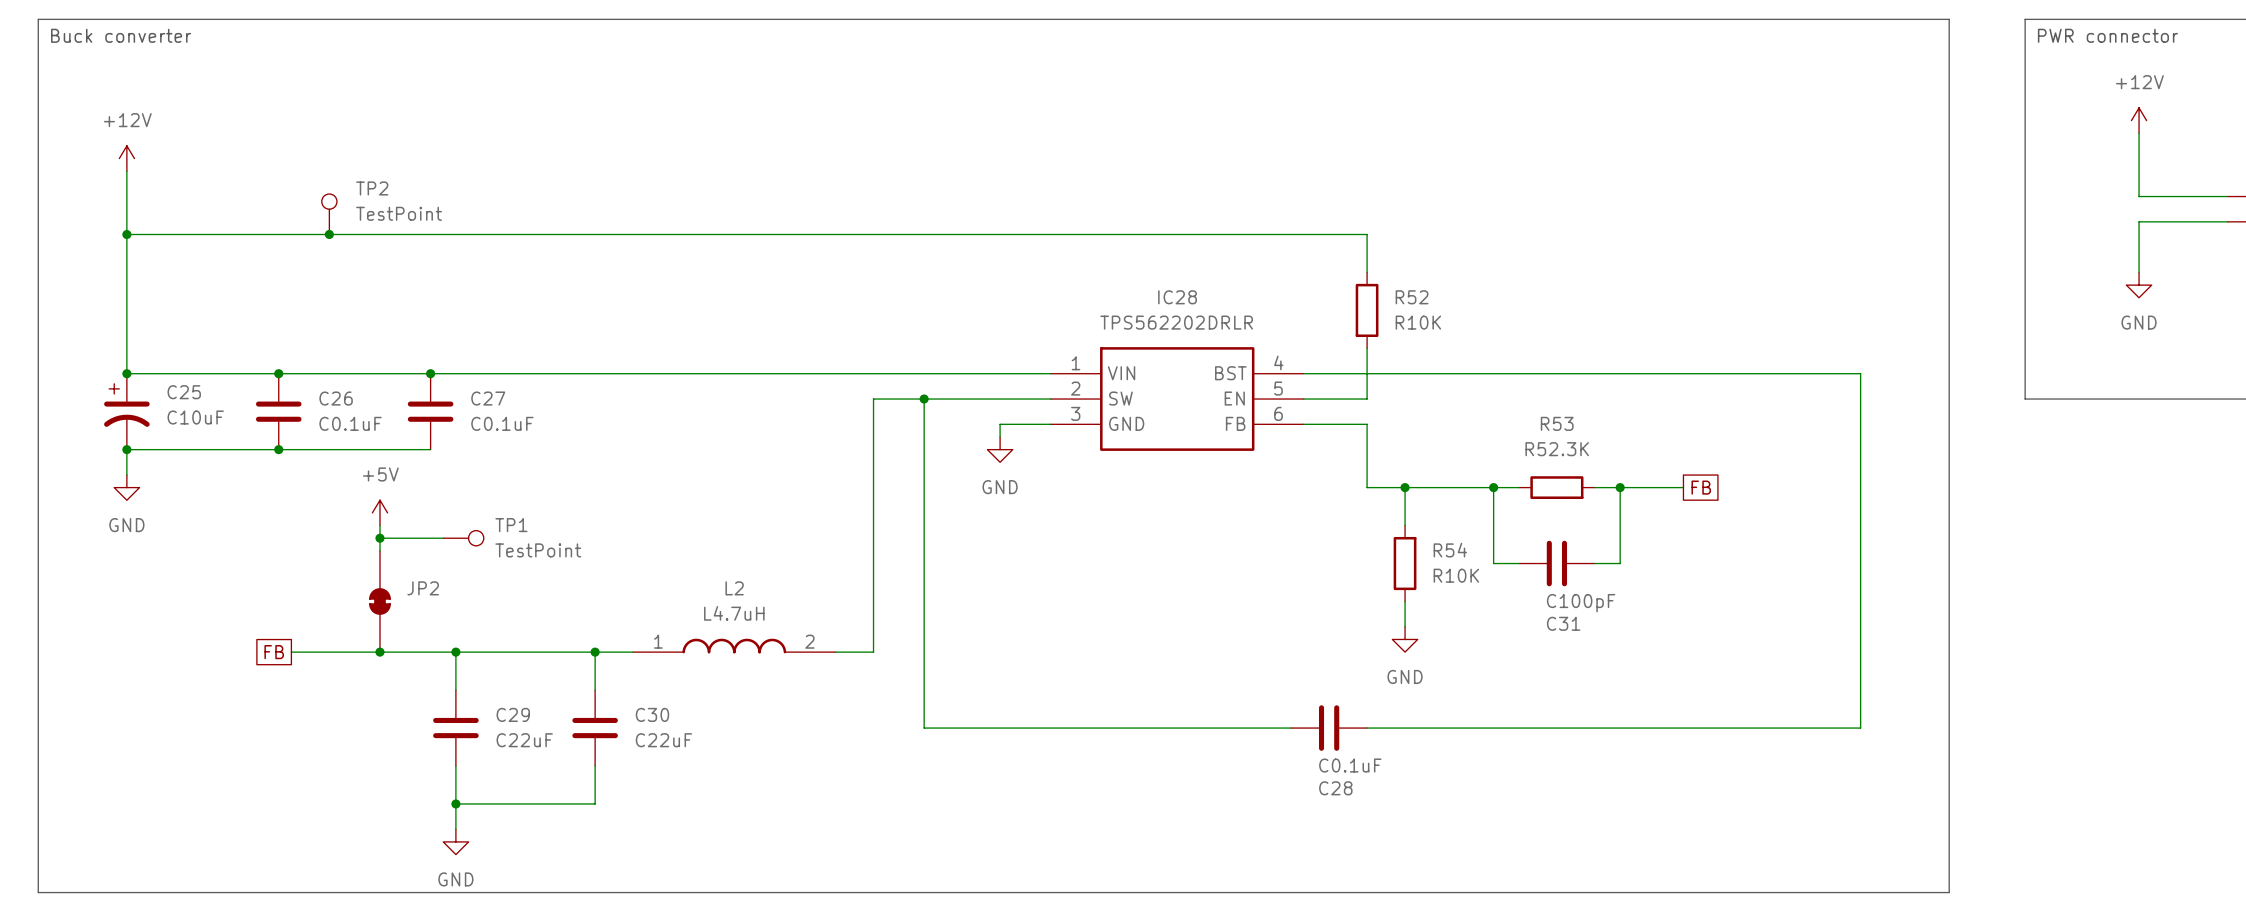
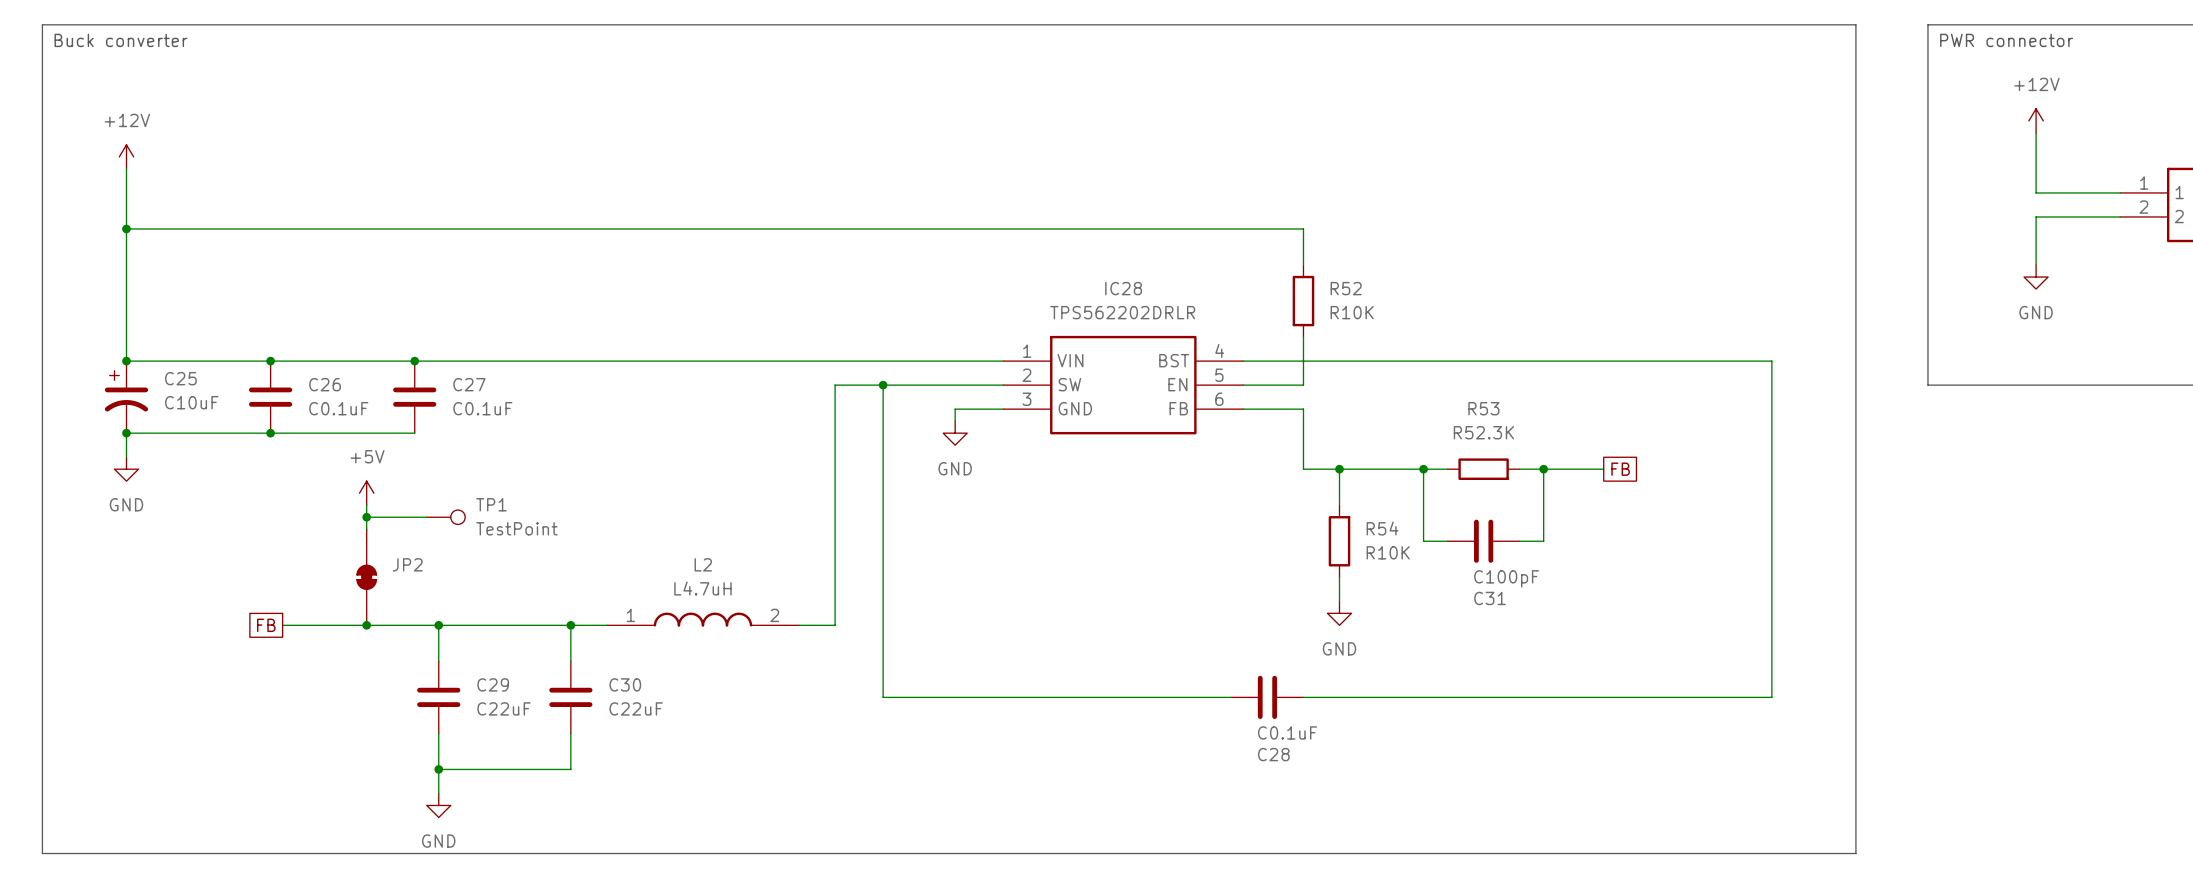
TP2: TestPoint (329, 214) -> none
junction: (329, 234) -> none

